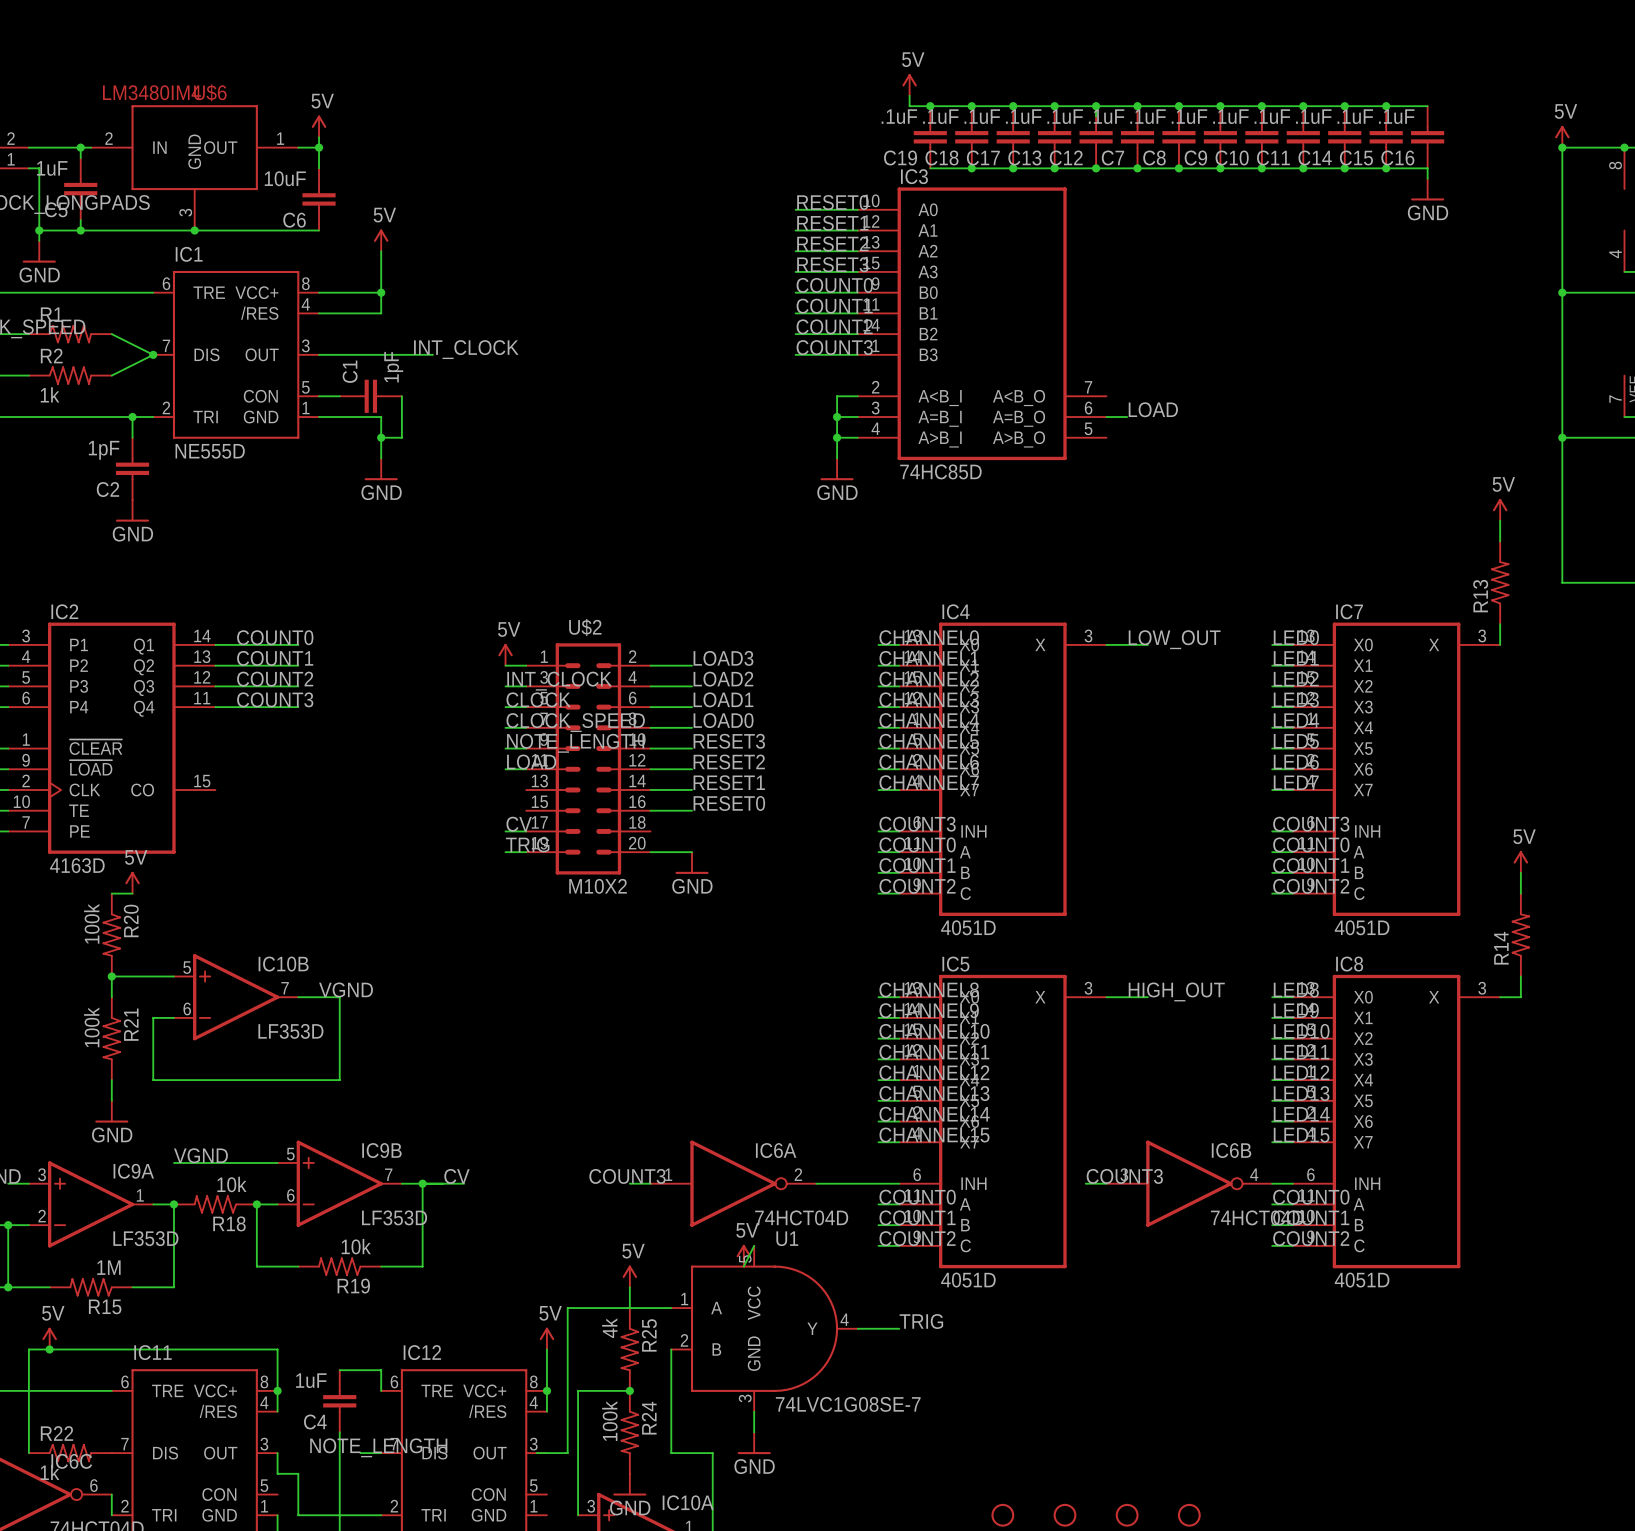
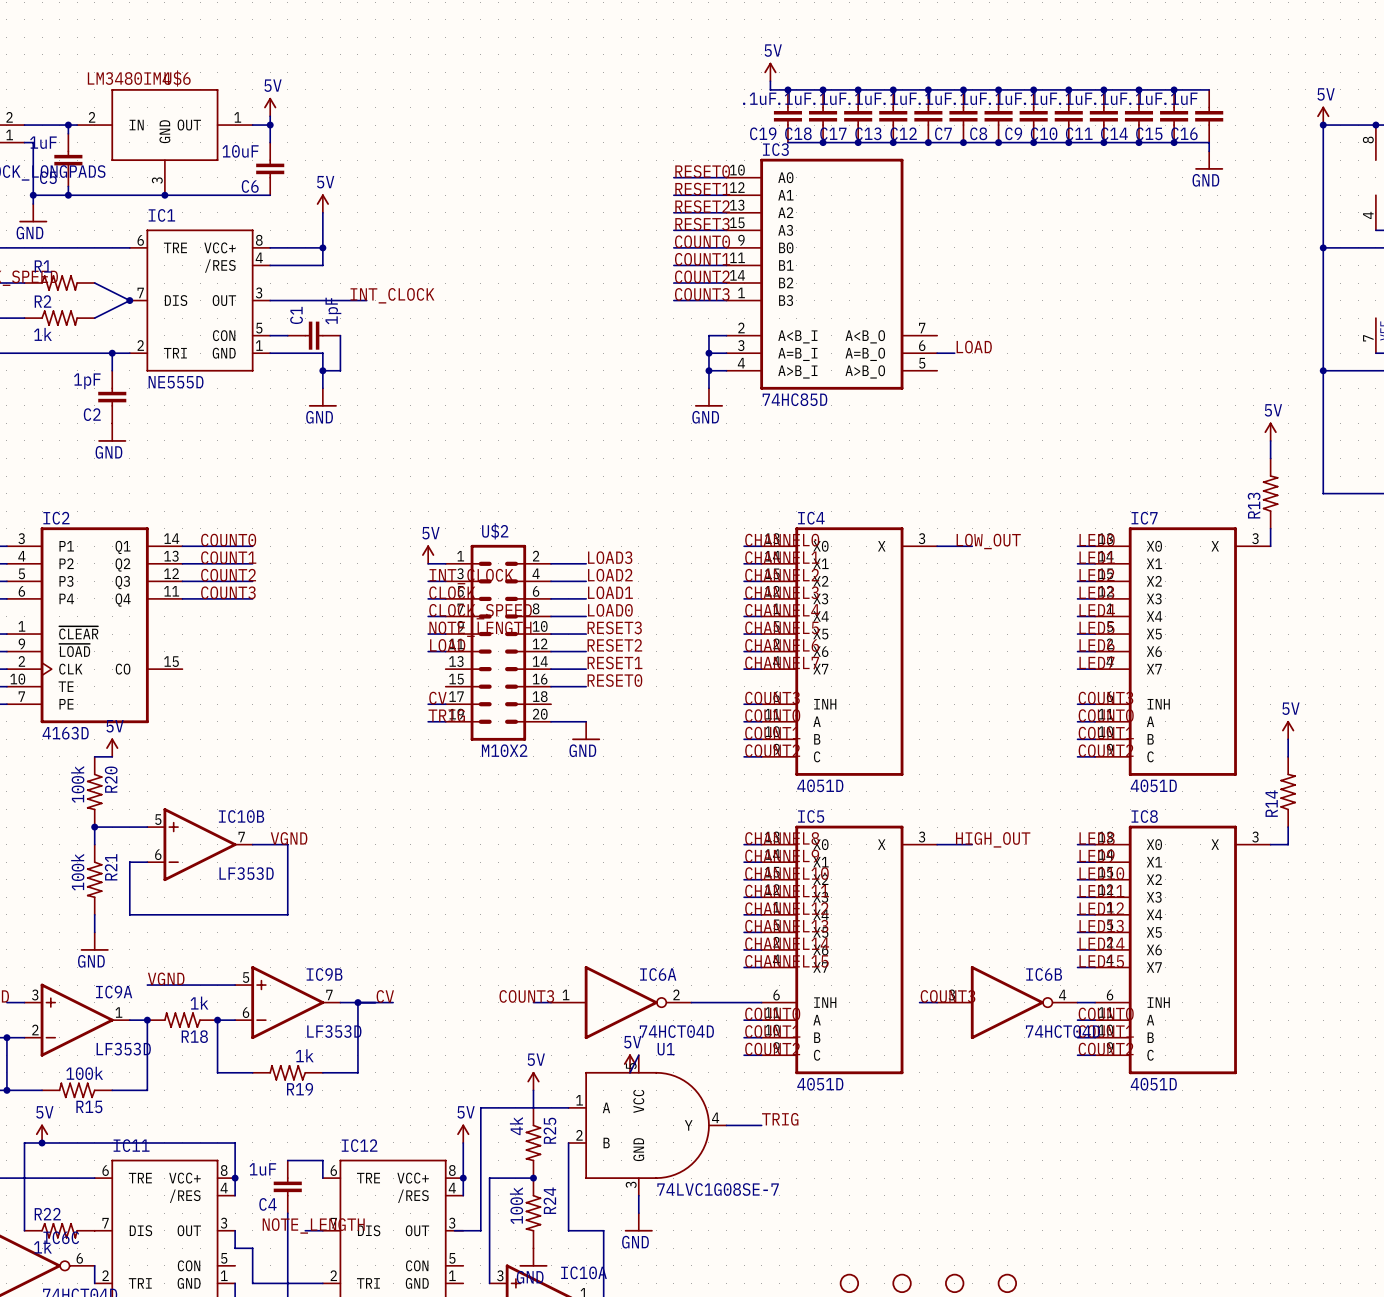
R18 value: 10k (231, 1184) -> 1k (199, 1003)
R19 value: 10k (356, 1246) -> 1k (304, 1055)
R15 value: 1M (108, 1267) -> 100k (84, 1073)

